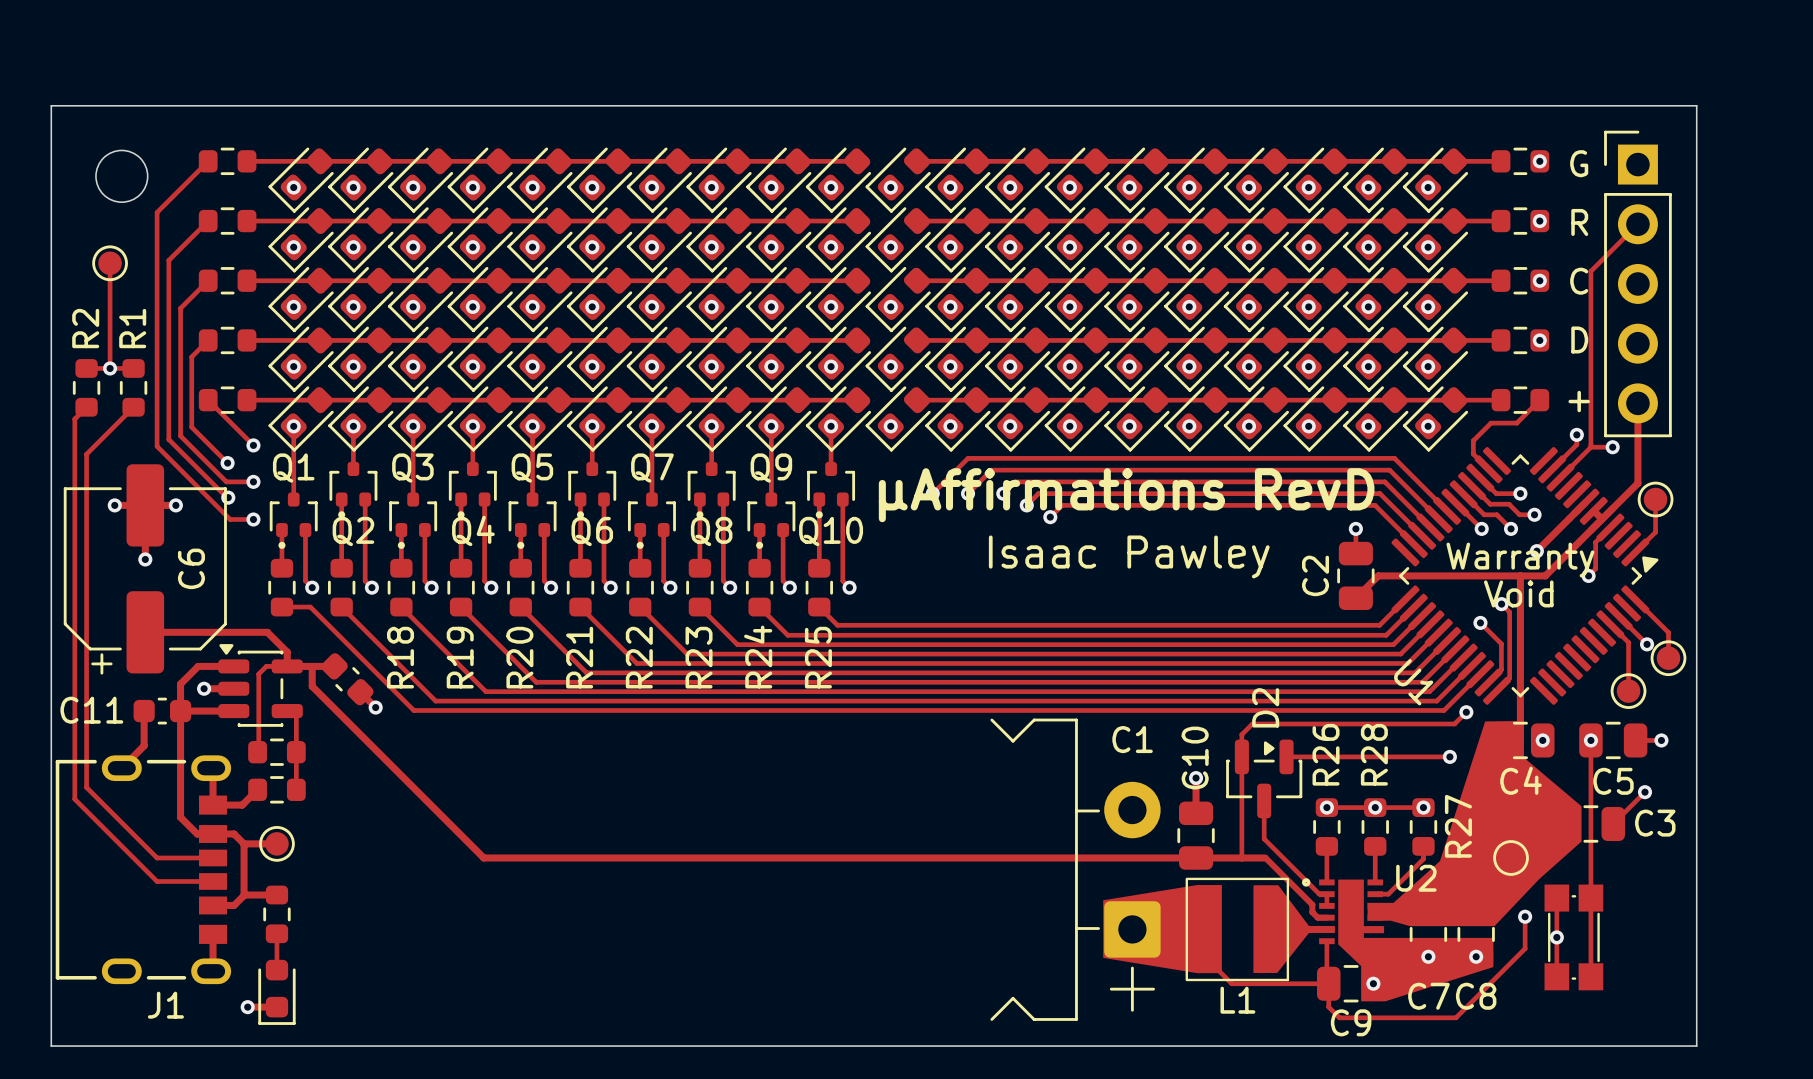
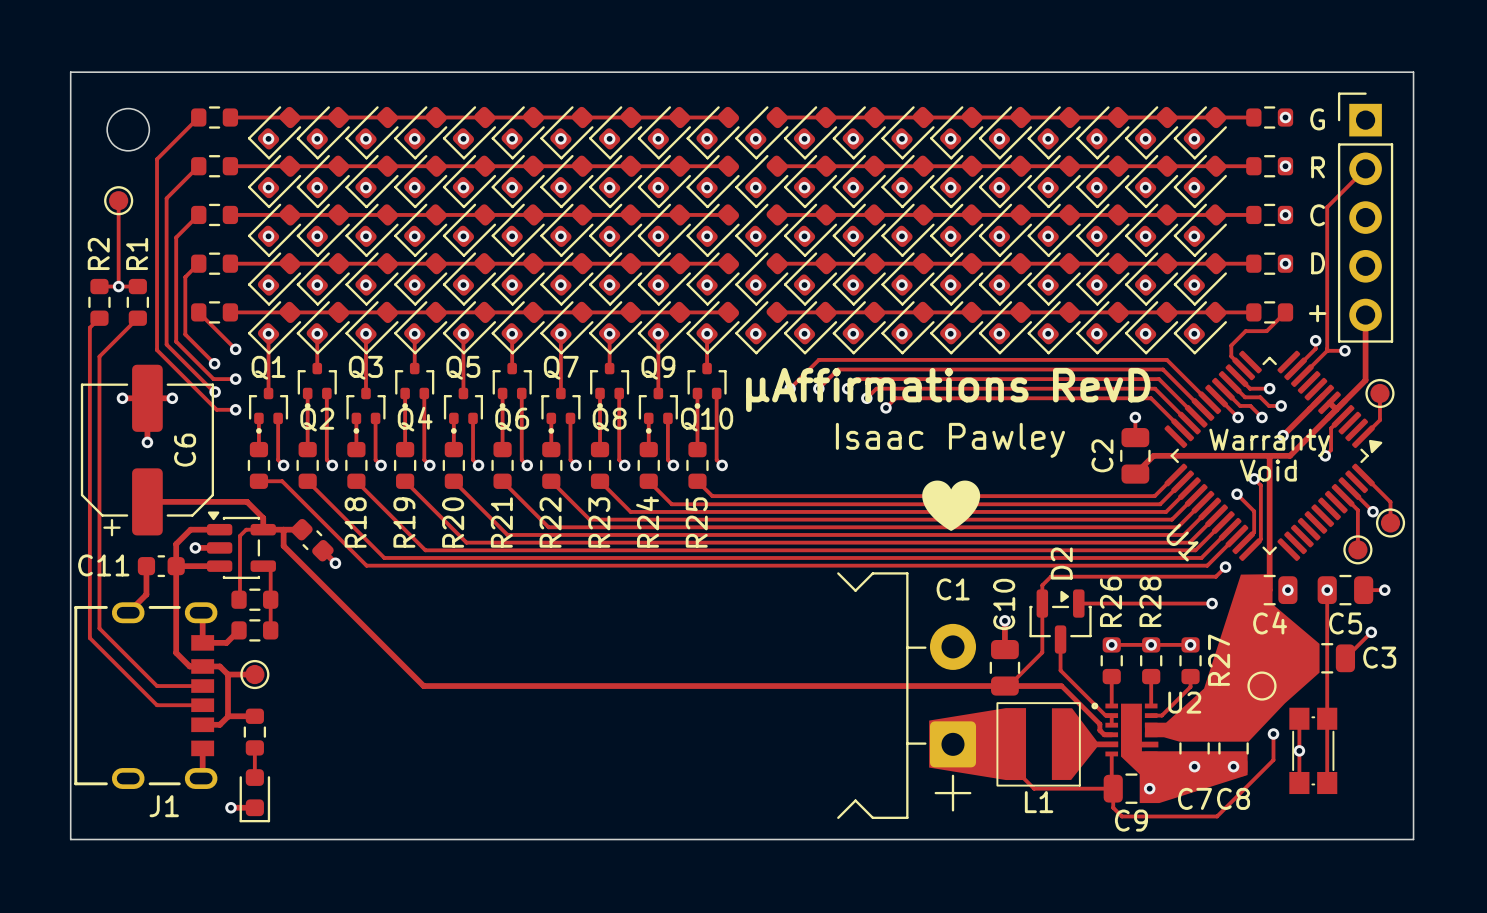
drawing: none -> [922, 480, 981, 531]
track: (1241, 816) (1241, 857) -> (1042, 652) (1008, 686)

